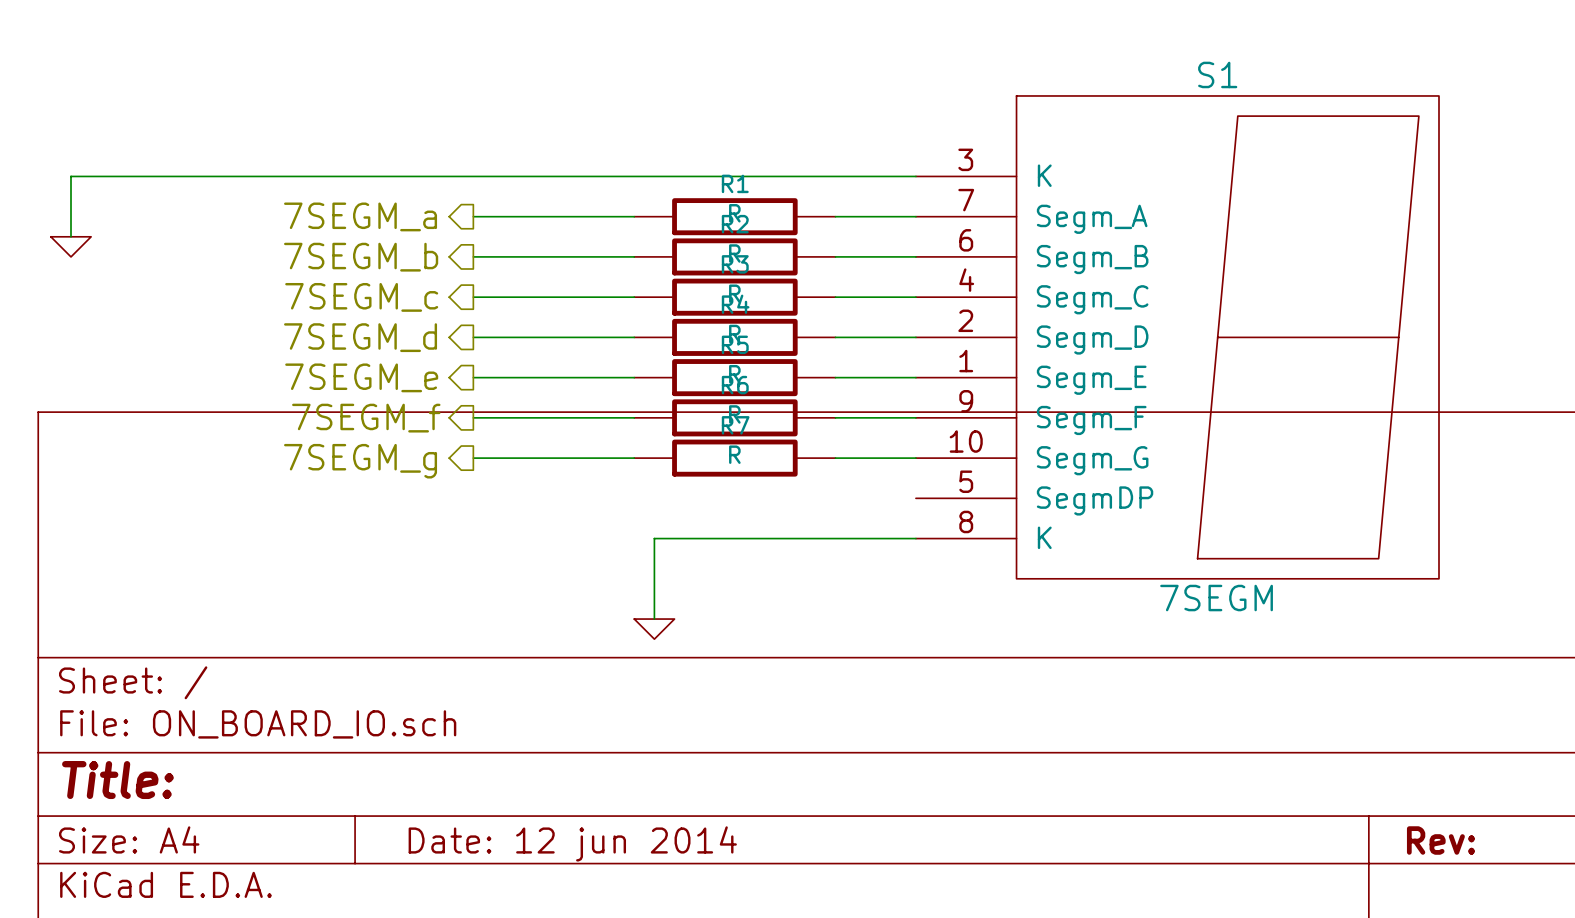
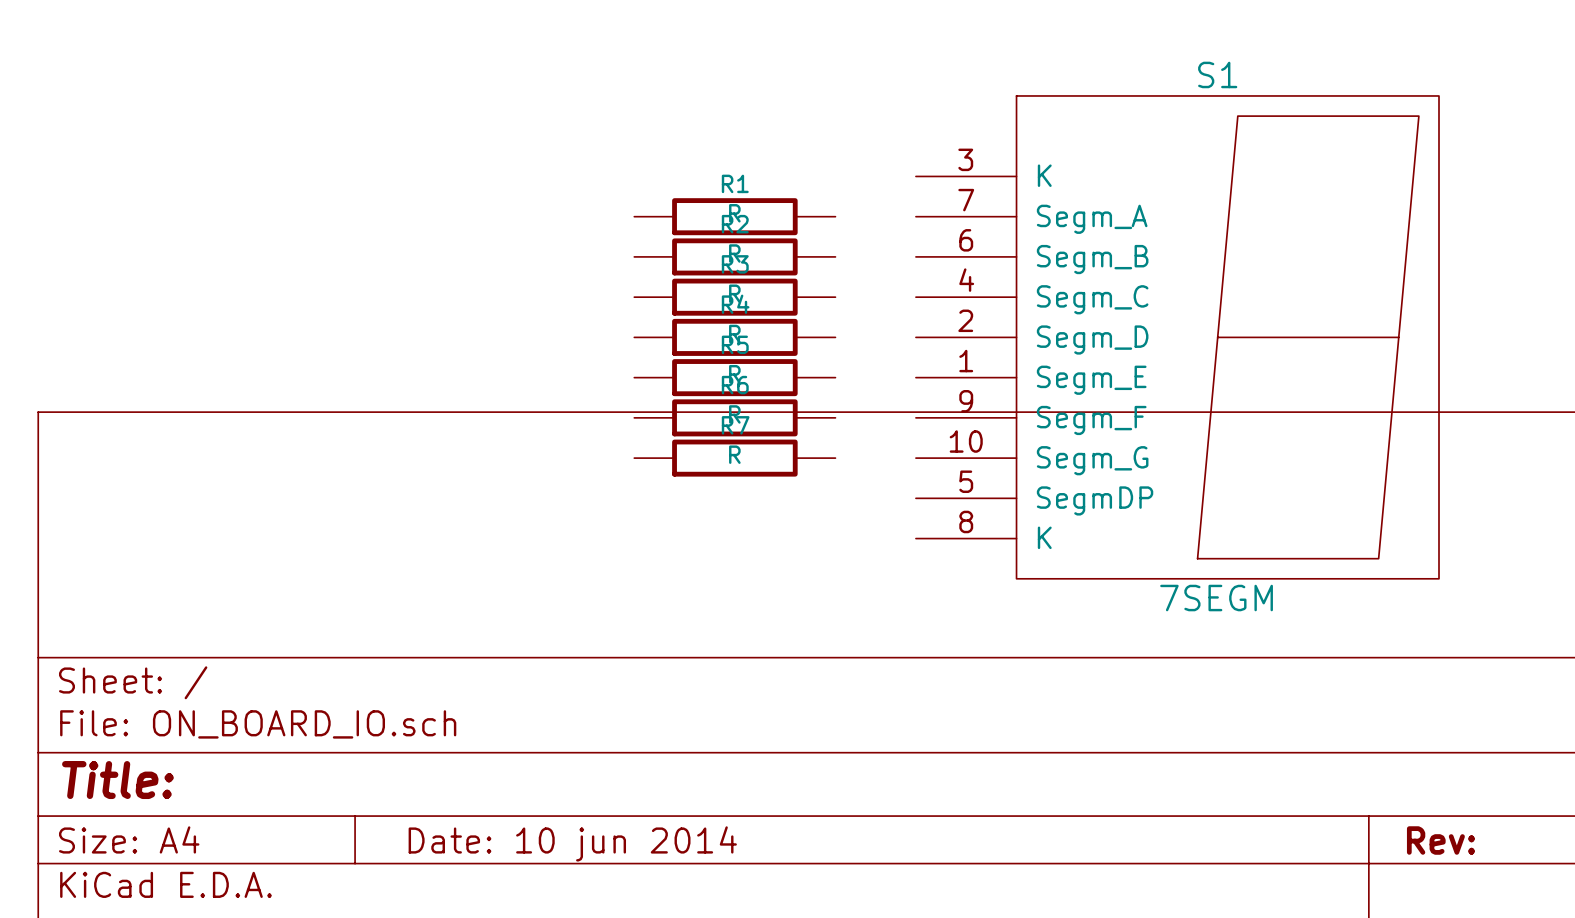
wire: (915, 176) (71, 176) (71, 236) -> none
hierarchical label: 7SEGM_a (360, 216) -> none
wire: (473, 216) (634, 216) -> none
wire: (835, 216) (915, 216) -> none
power symbol: (71, 246) -> none
wire: (473, 256) (634, 256) -> none
wire: (835, 256) (915, 256) -> none
hierarchical label: 7SEGM_b (361, 257) -> none
hierarchical label: 7SEGM_c (361, 297) -> none
wire: (473, 297) (634, 297) -> none
wire: (835, 297) (915, 297) -> none
hierarchical label: 7SEGM_d (360, 337) -> none
wire: (473, 337) (634, 337) -> none
wire: (835, 337) (915, 337) -> none
hierarchical label: 7SEGM_e (361, 377) -> none
wire: (473, 377) (634, 377) -> none
wire: (835, 377) (915, 377) -> none
wire: (473, 417) (634, 417) -> none
wire: (835, 417) (915, 417) -> none
hierarchical label: 7SEGM_f (366, 418) -> none
wire: (473, 458) (634, 458) -> none
wire: (835, 458) (915, 458) -> none
hierarchical label: 7SEGM_g (360, 461) -> none
wire: (915, 538) (654, 538) (654, 619) -> none
power symbol: (654, 629) -> none
title block: Date: 12 jun 2014 (572, 843) -> Date: 10 jun 2014 (572, 843)

